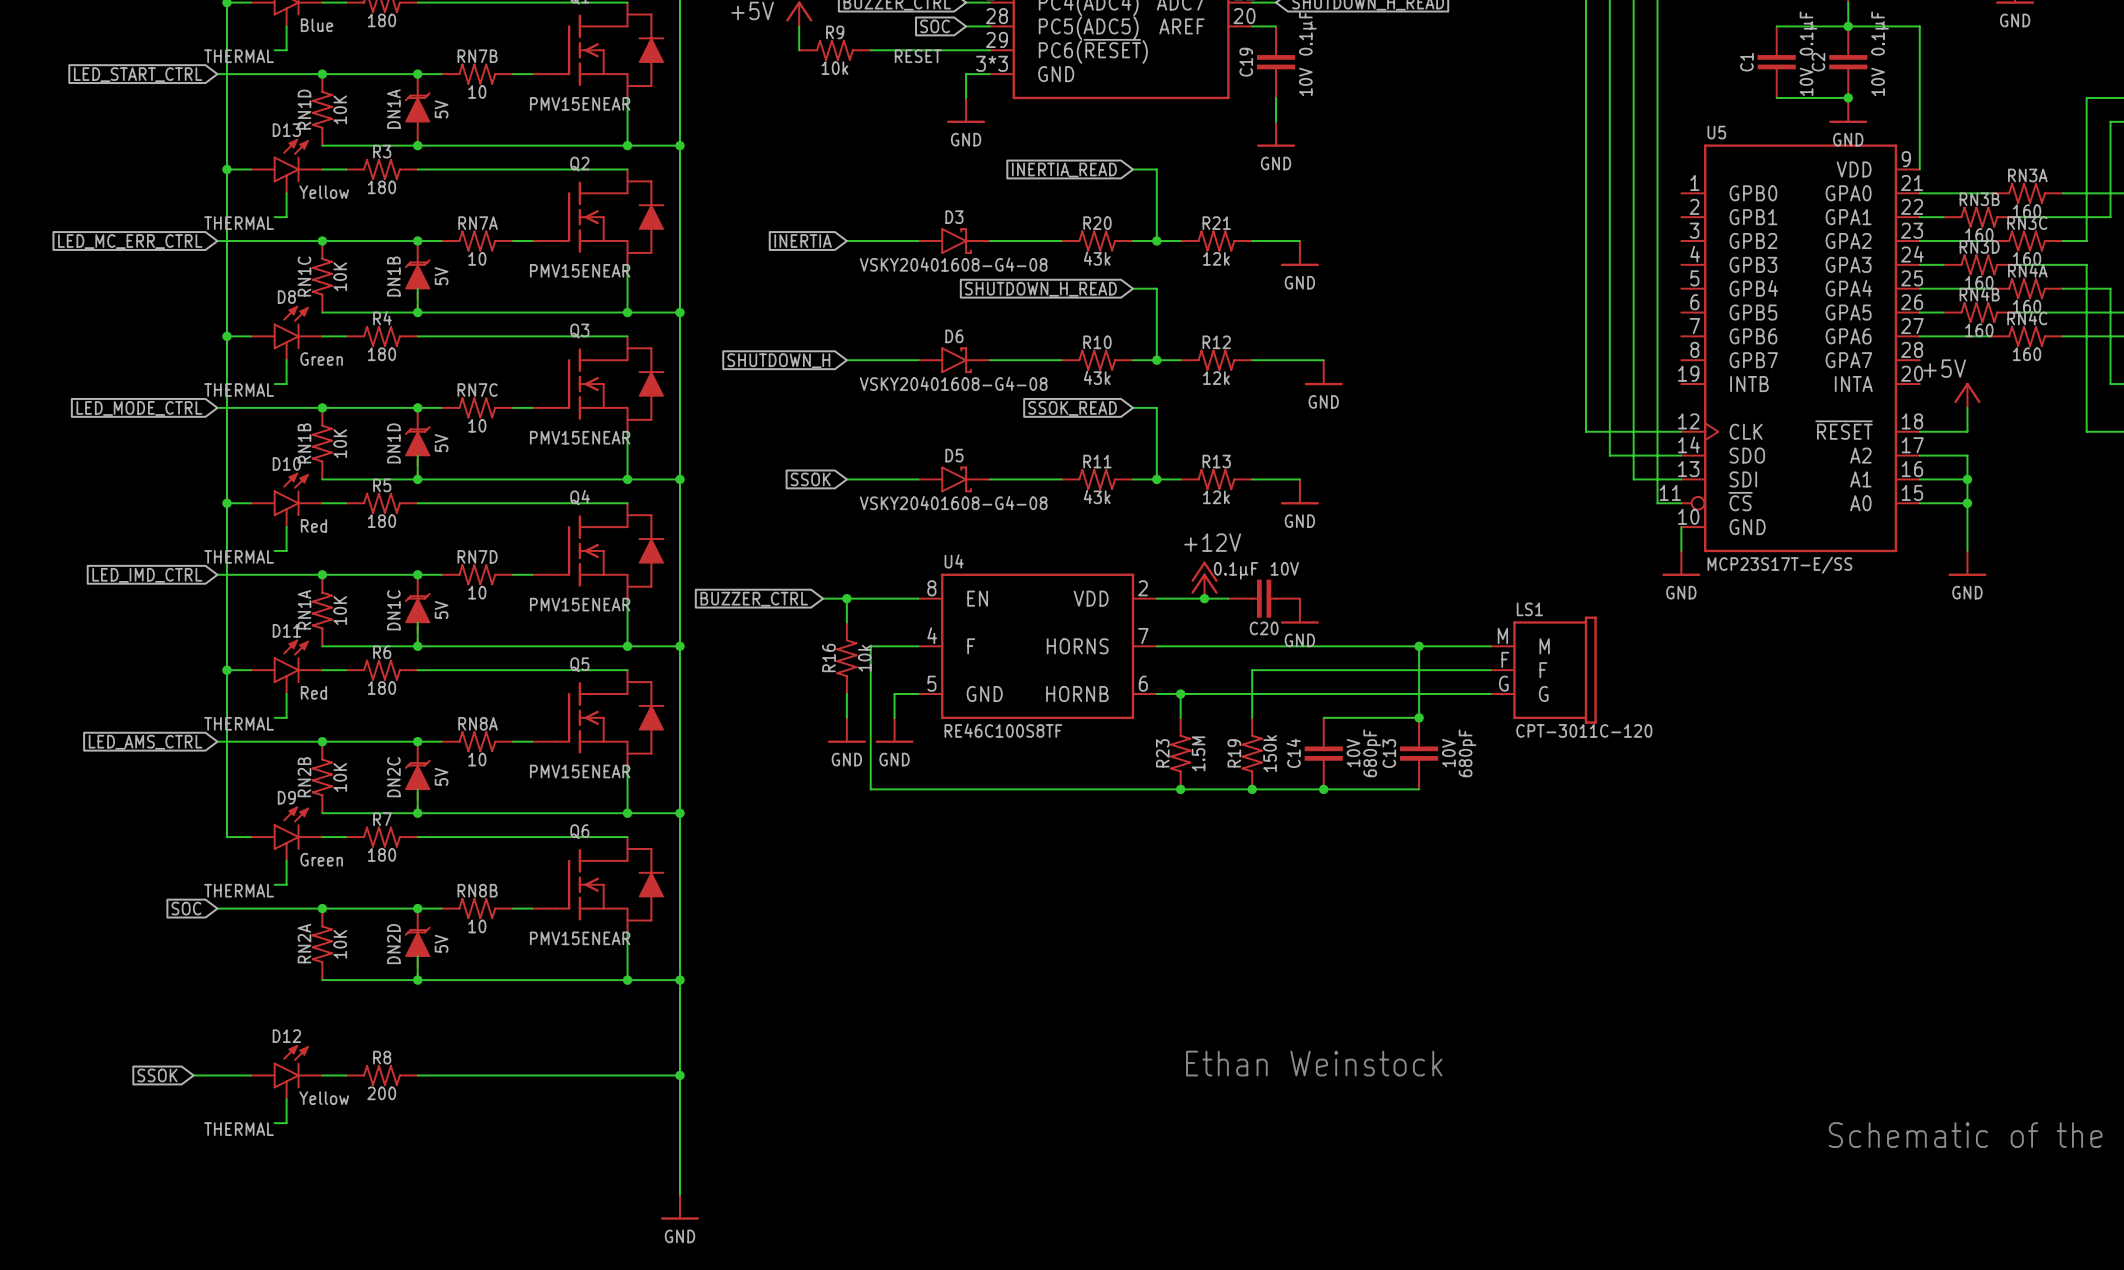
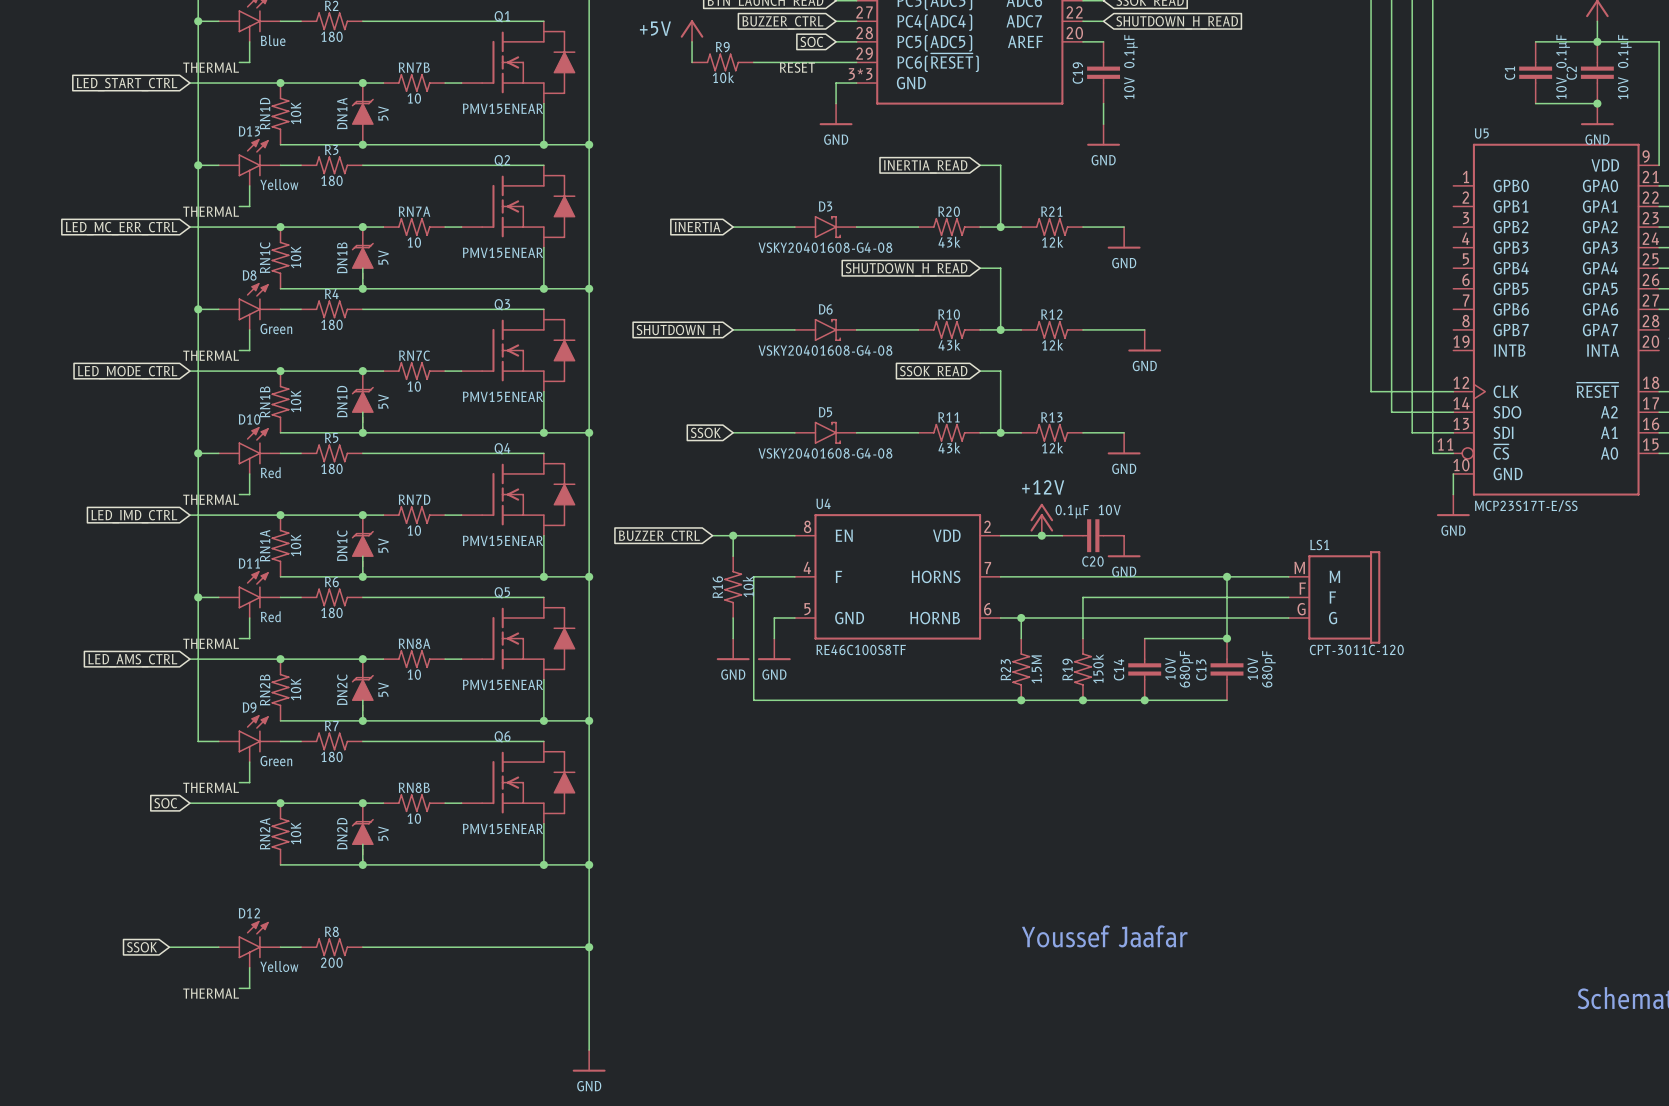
text: Ethan Weinstock (1314, 1063) -> Youssef Jaafar (1104, 936)

